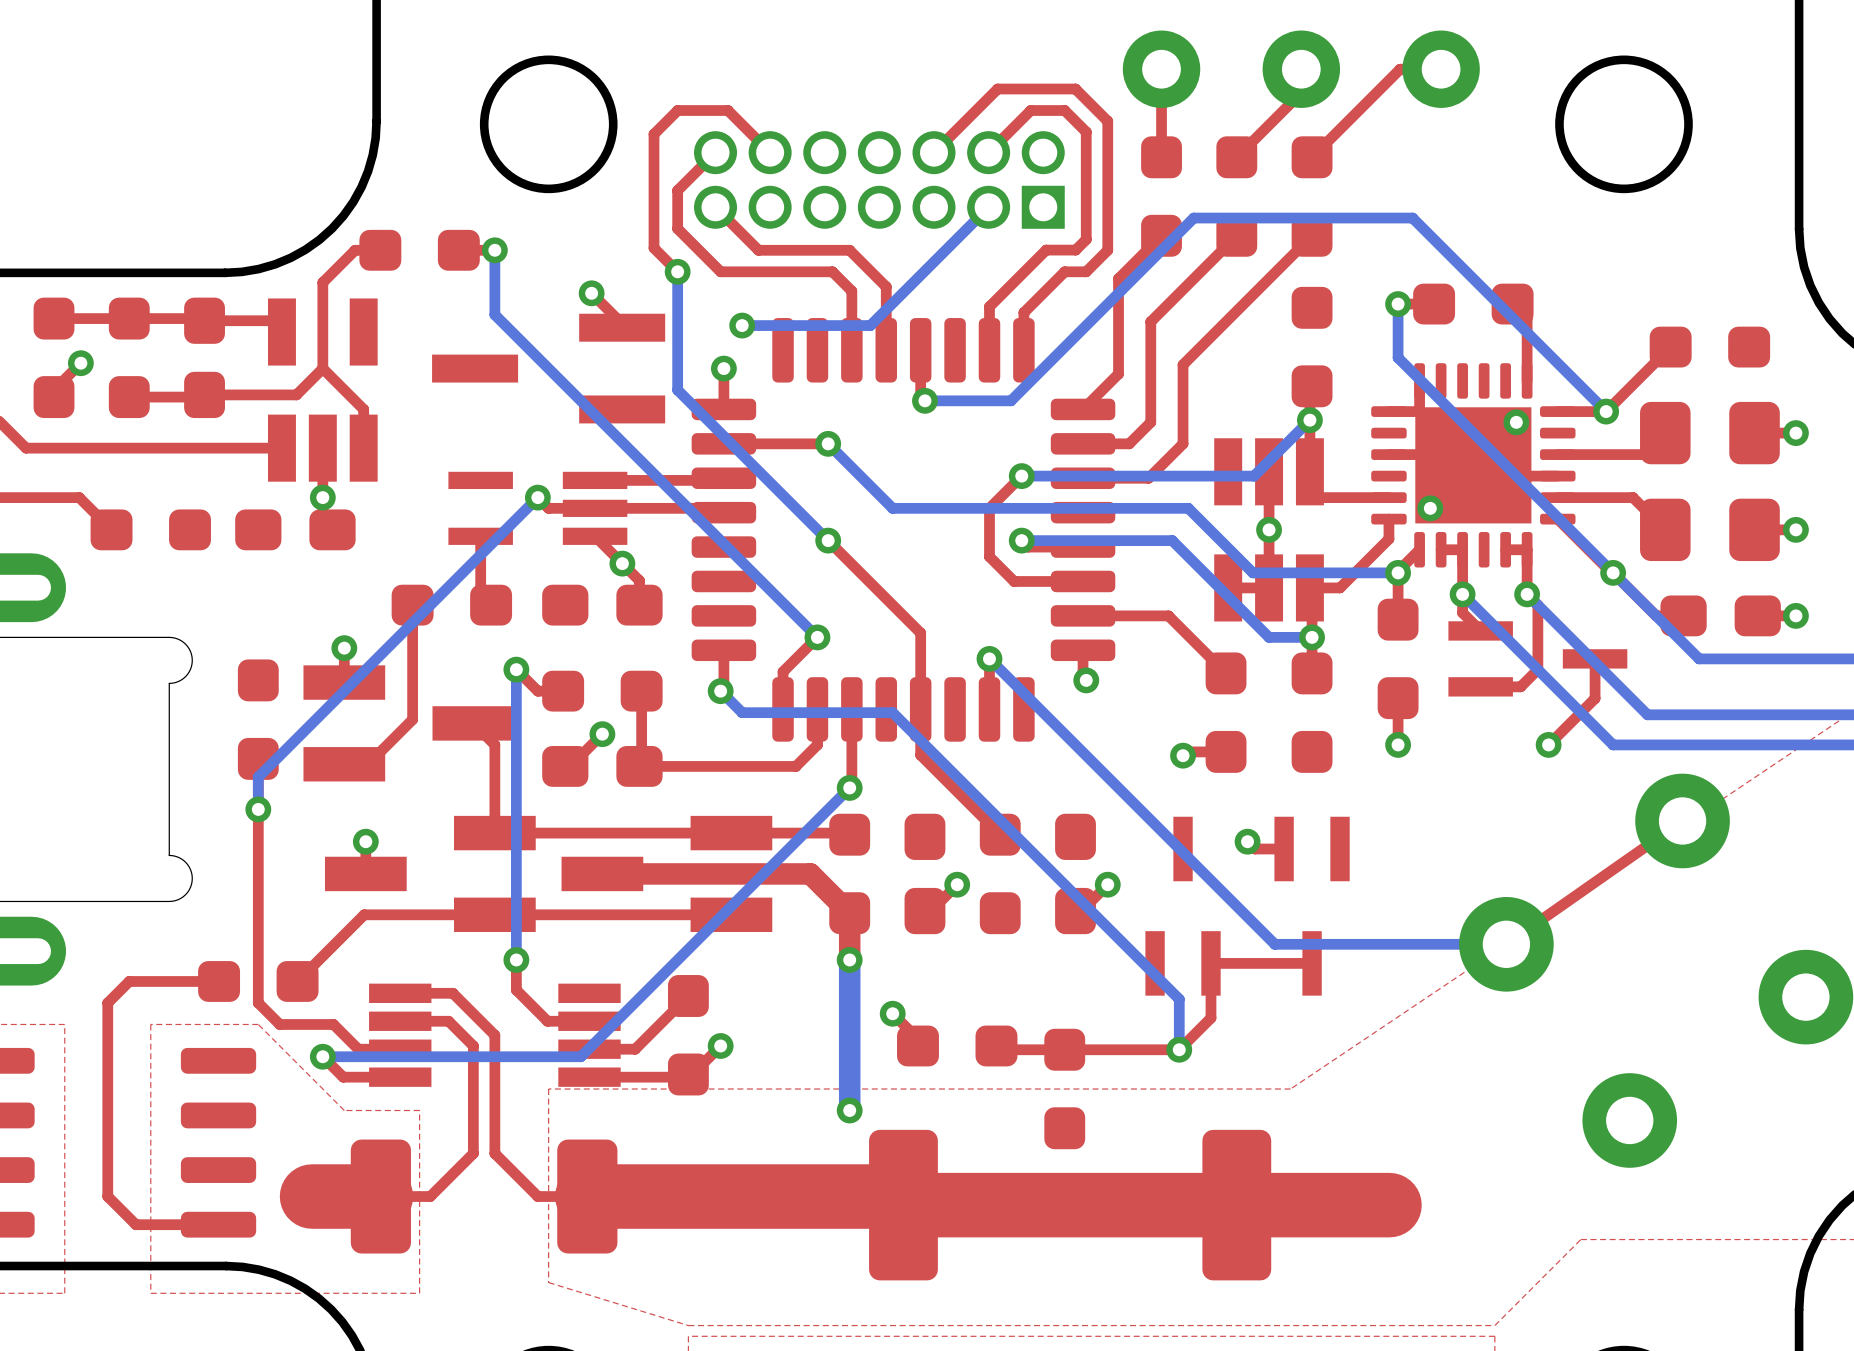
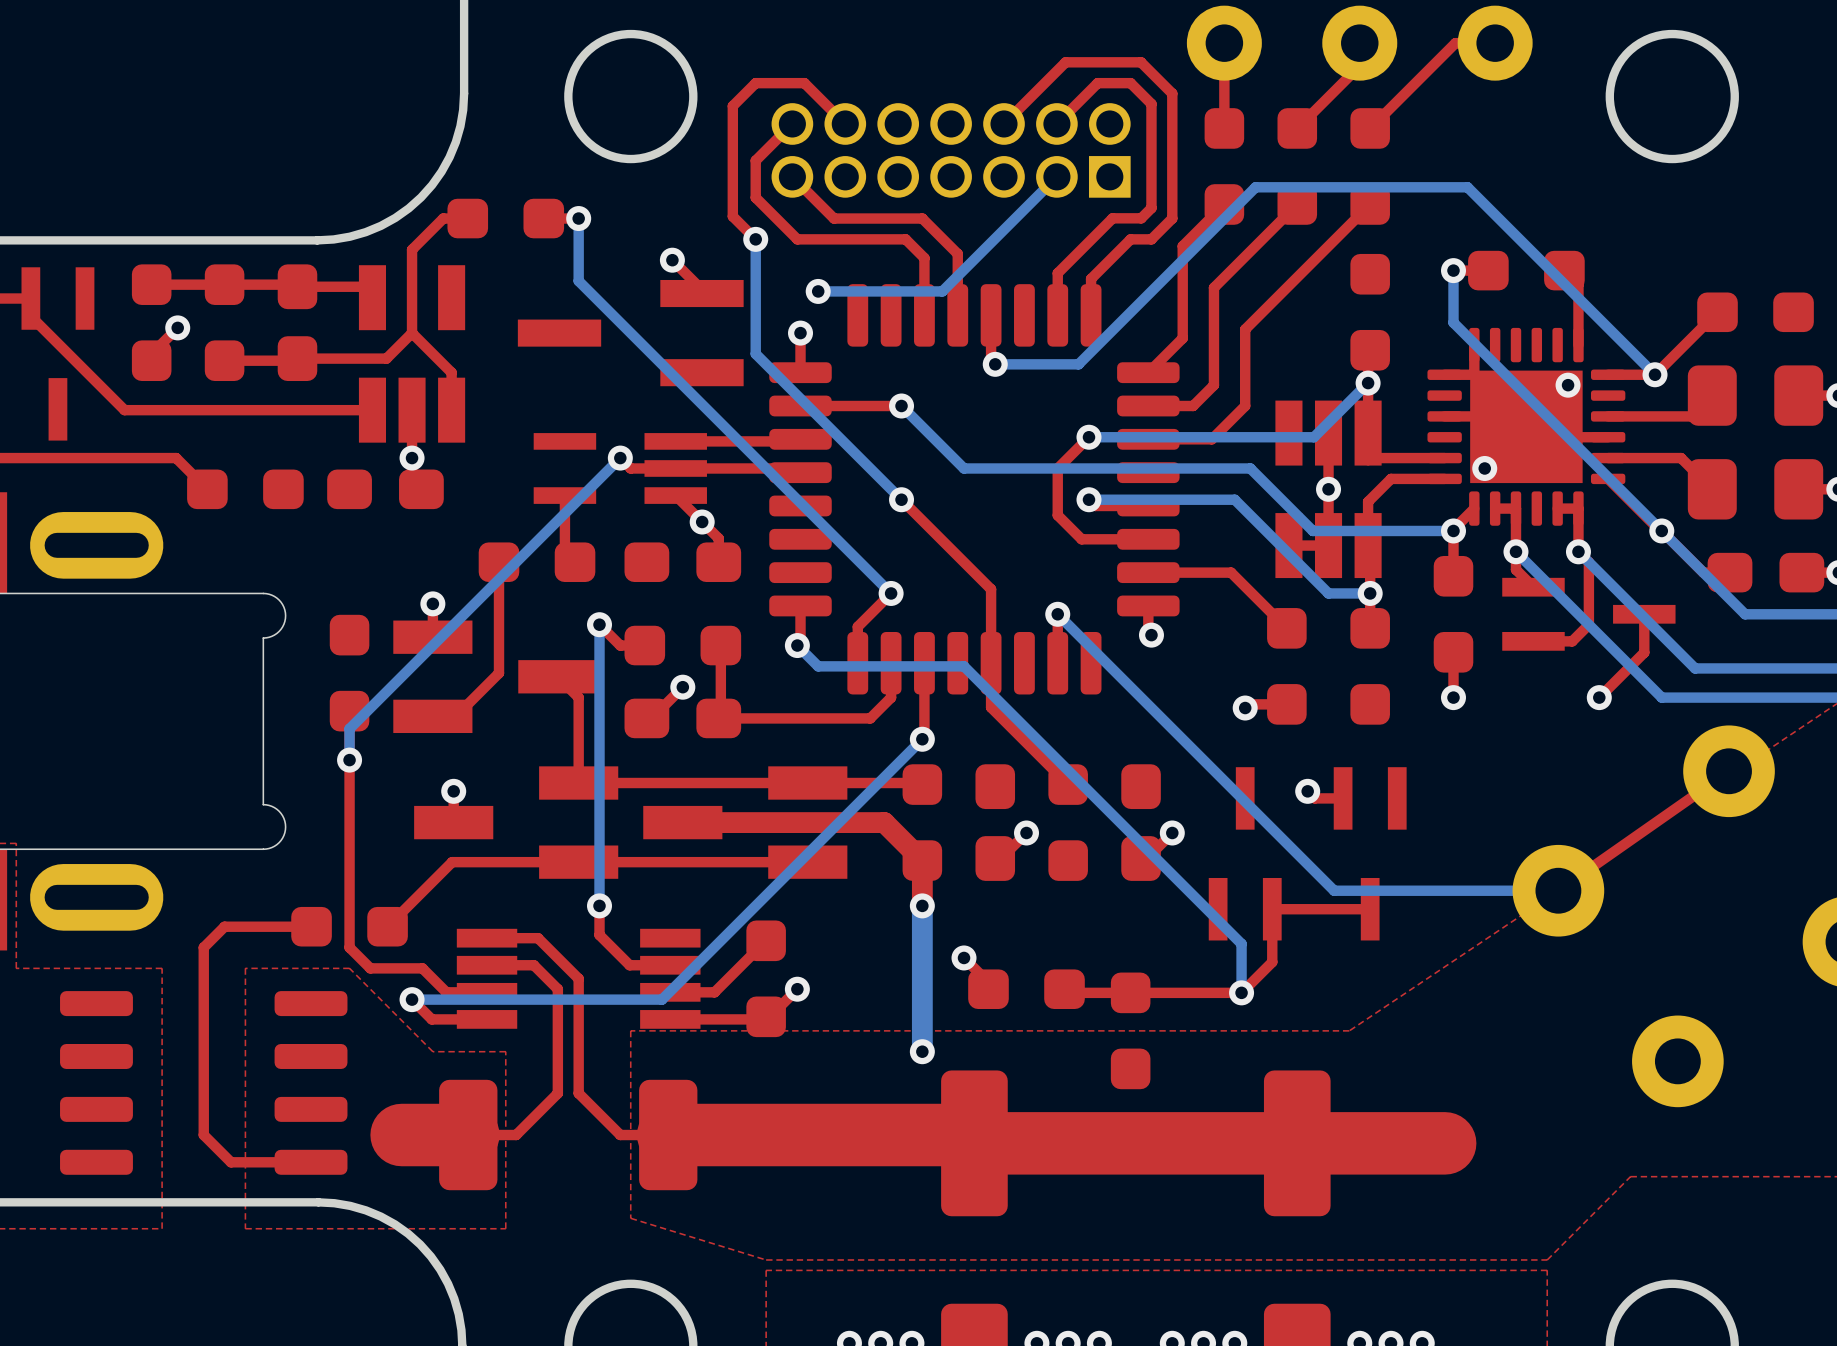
top track: (1388, 519) (1388, 539) (1340, 587) (1309, 587) -> (1444, 478) (1391, 478) (1368, 501) (1368, 545)

